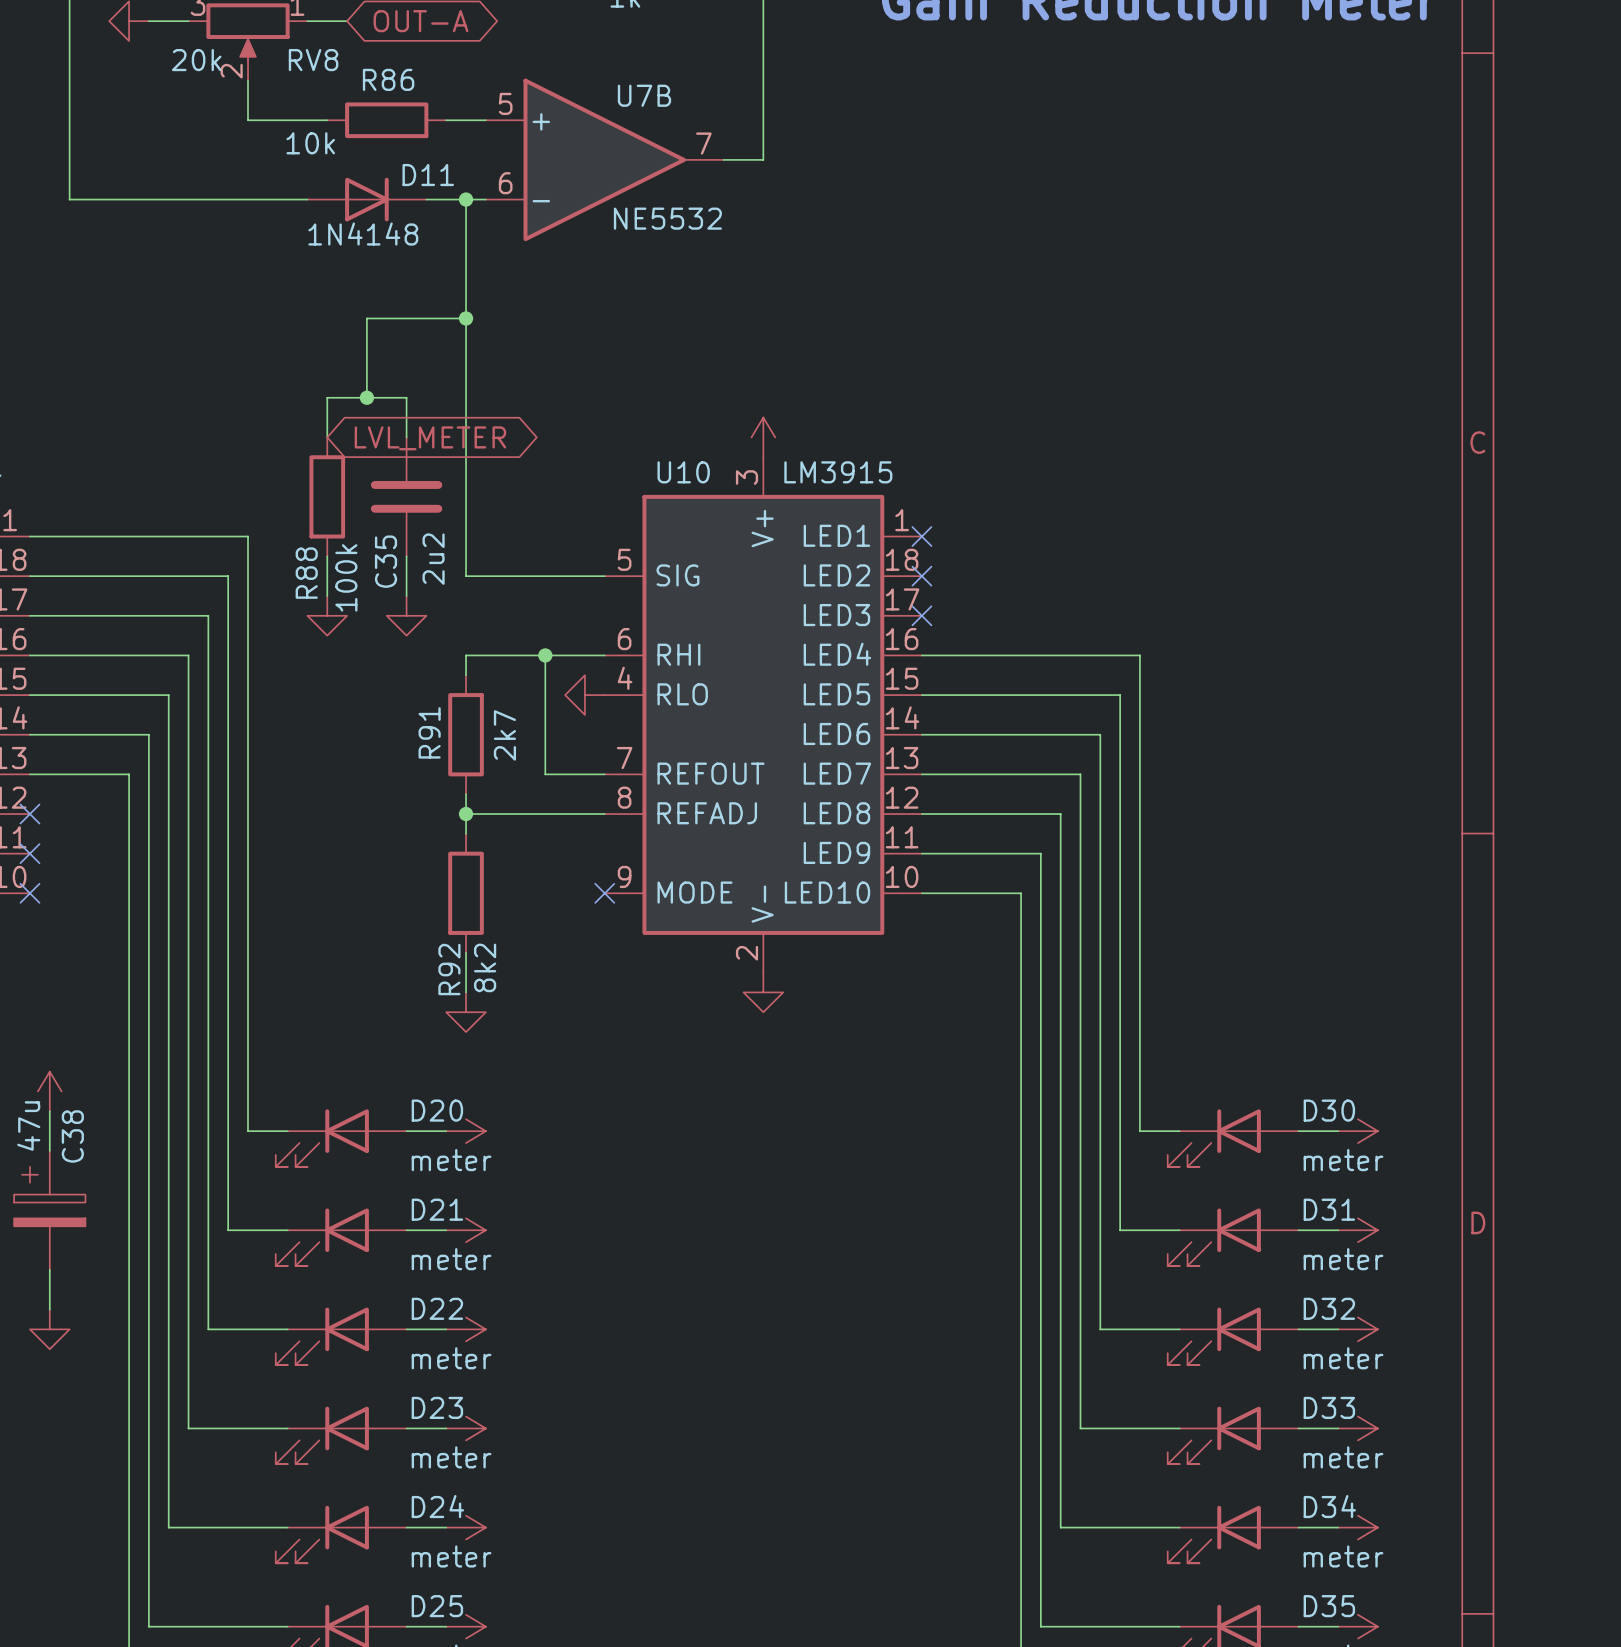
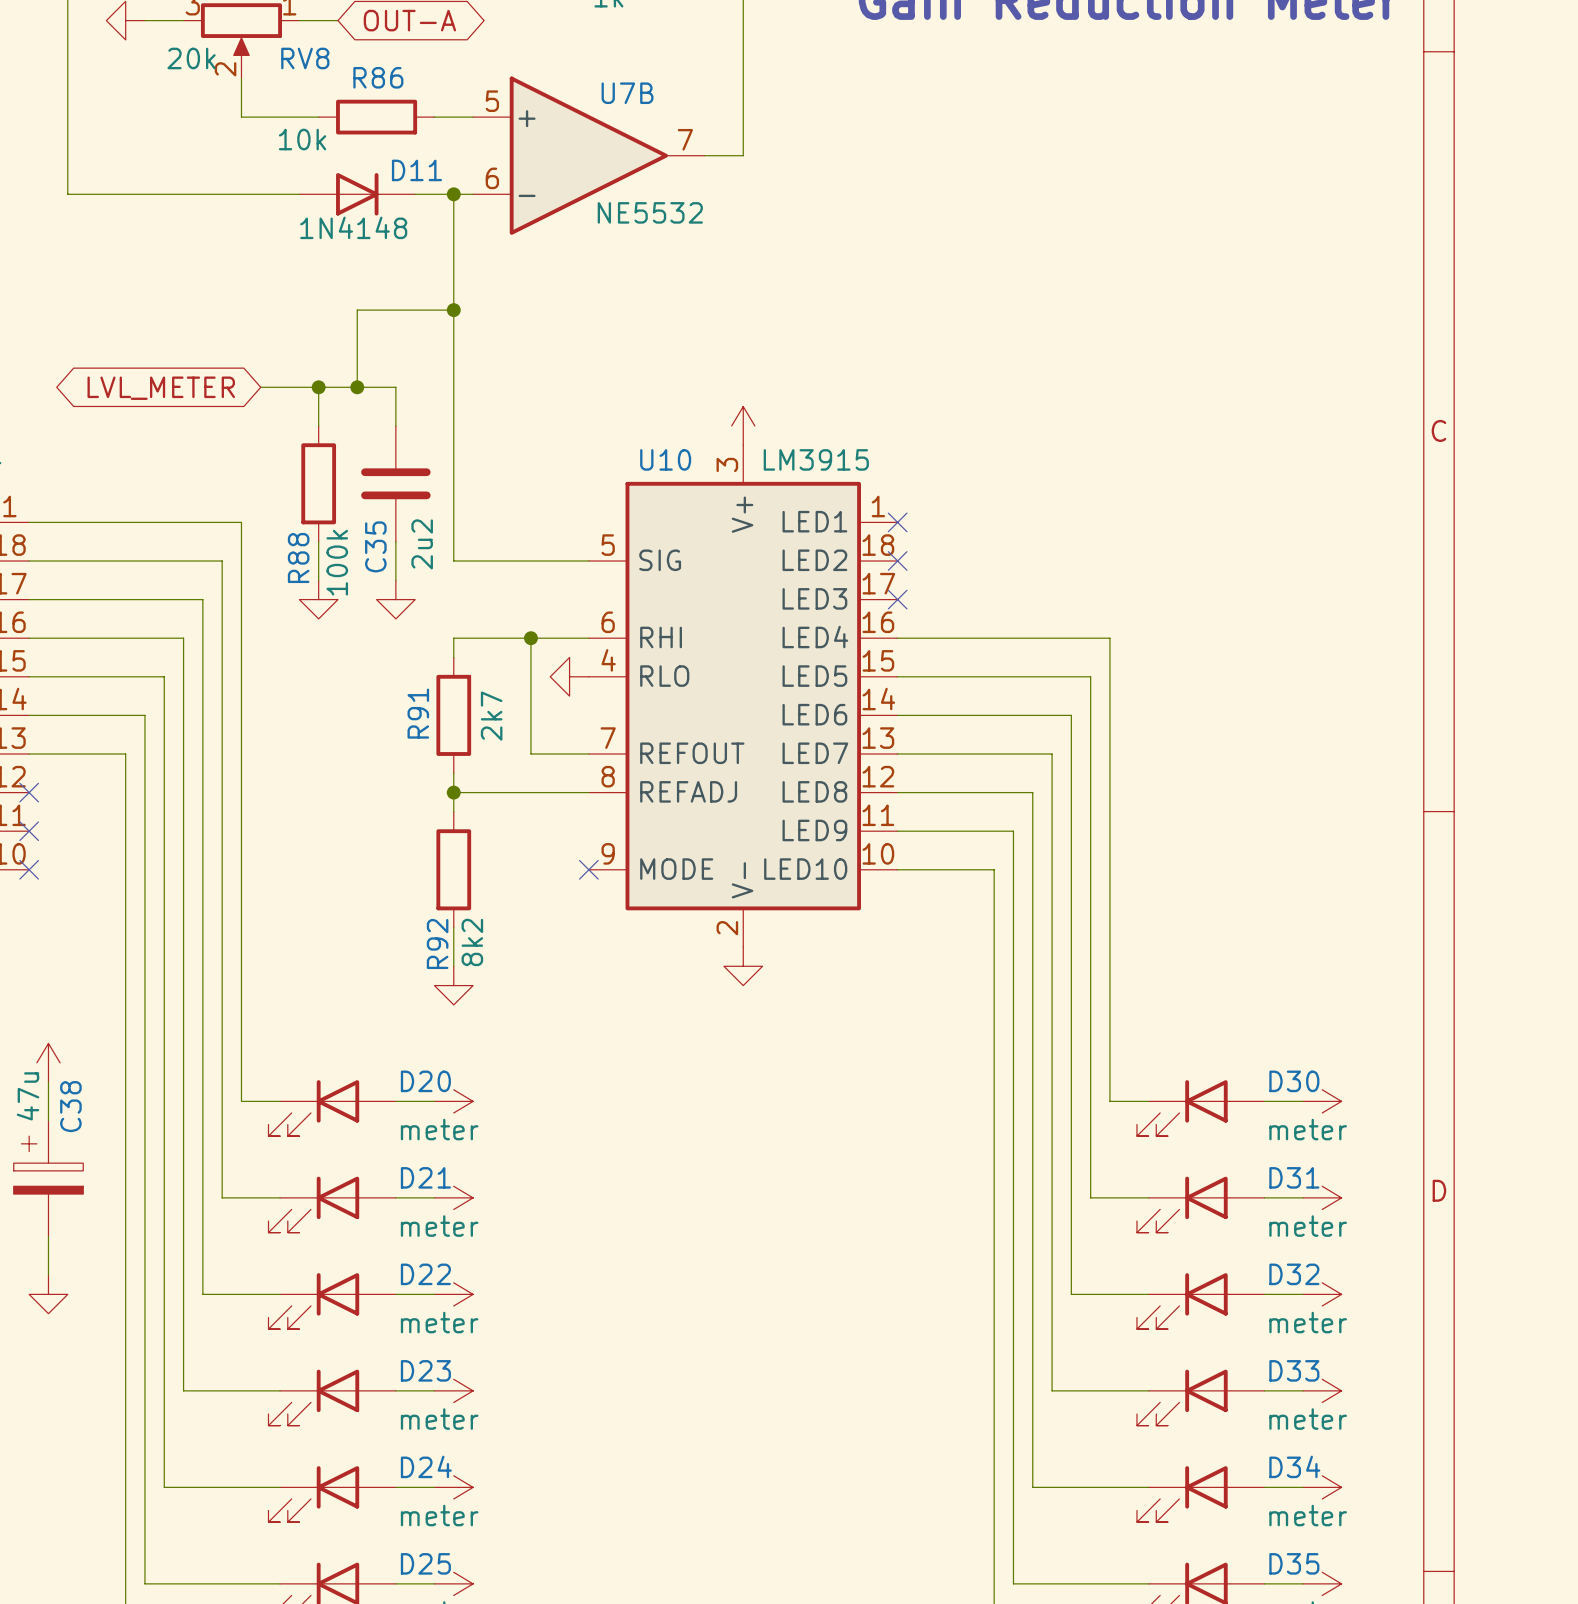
wire: none -> (260, 387) (318, 387)
junction: none -> (318, 387)
global label rotation: 0° (430, 438) -> 180° (161, 388)
global label position: LVL_METER (430, 438) -> LVL_METER (161, 388)

